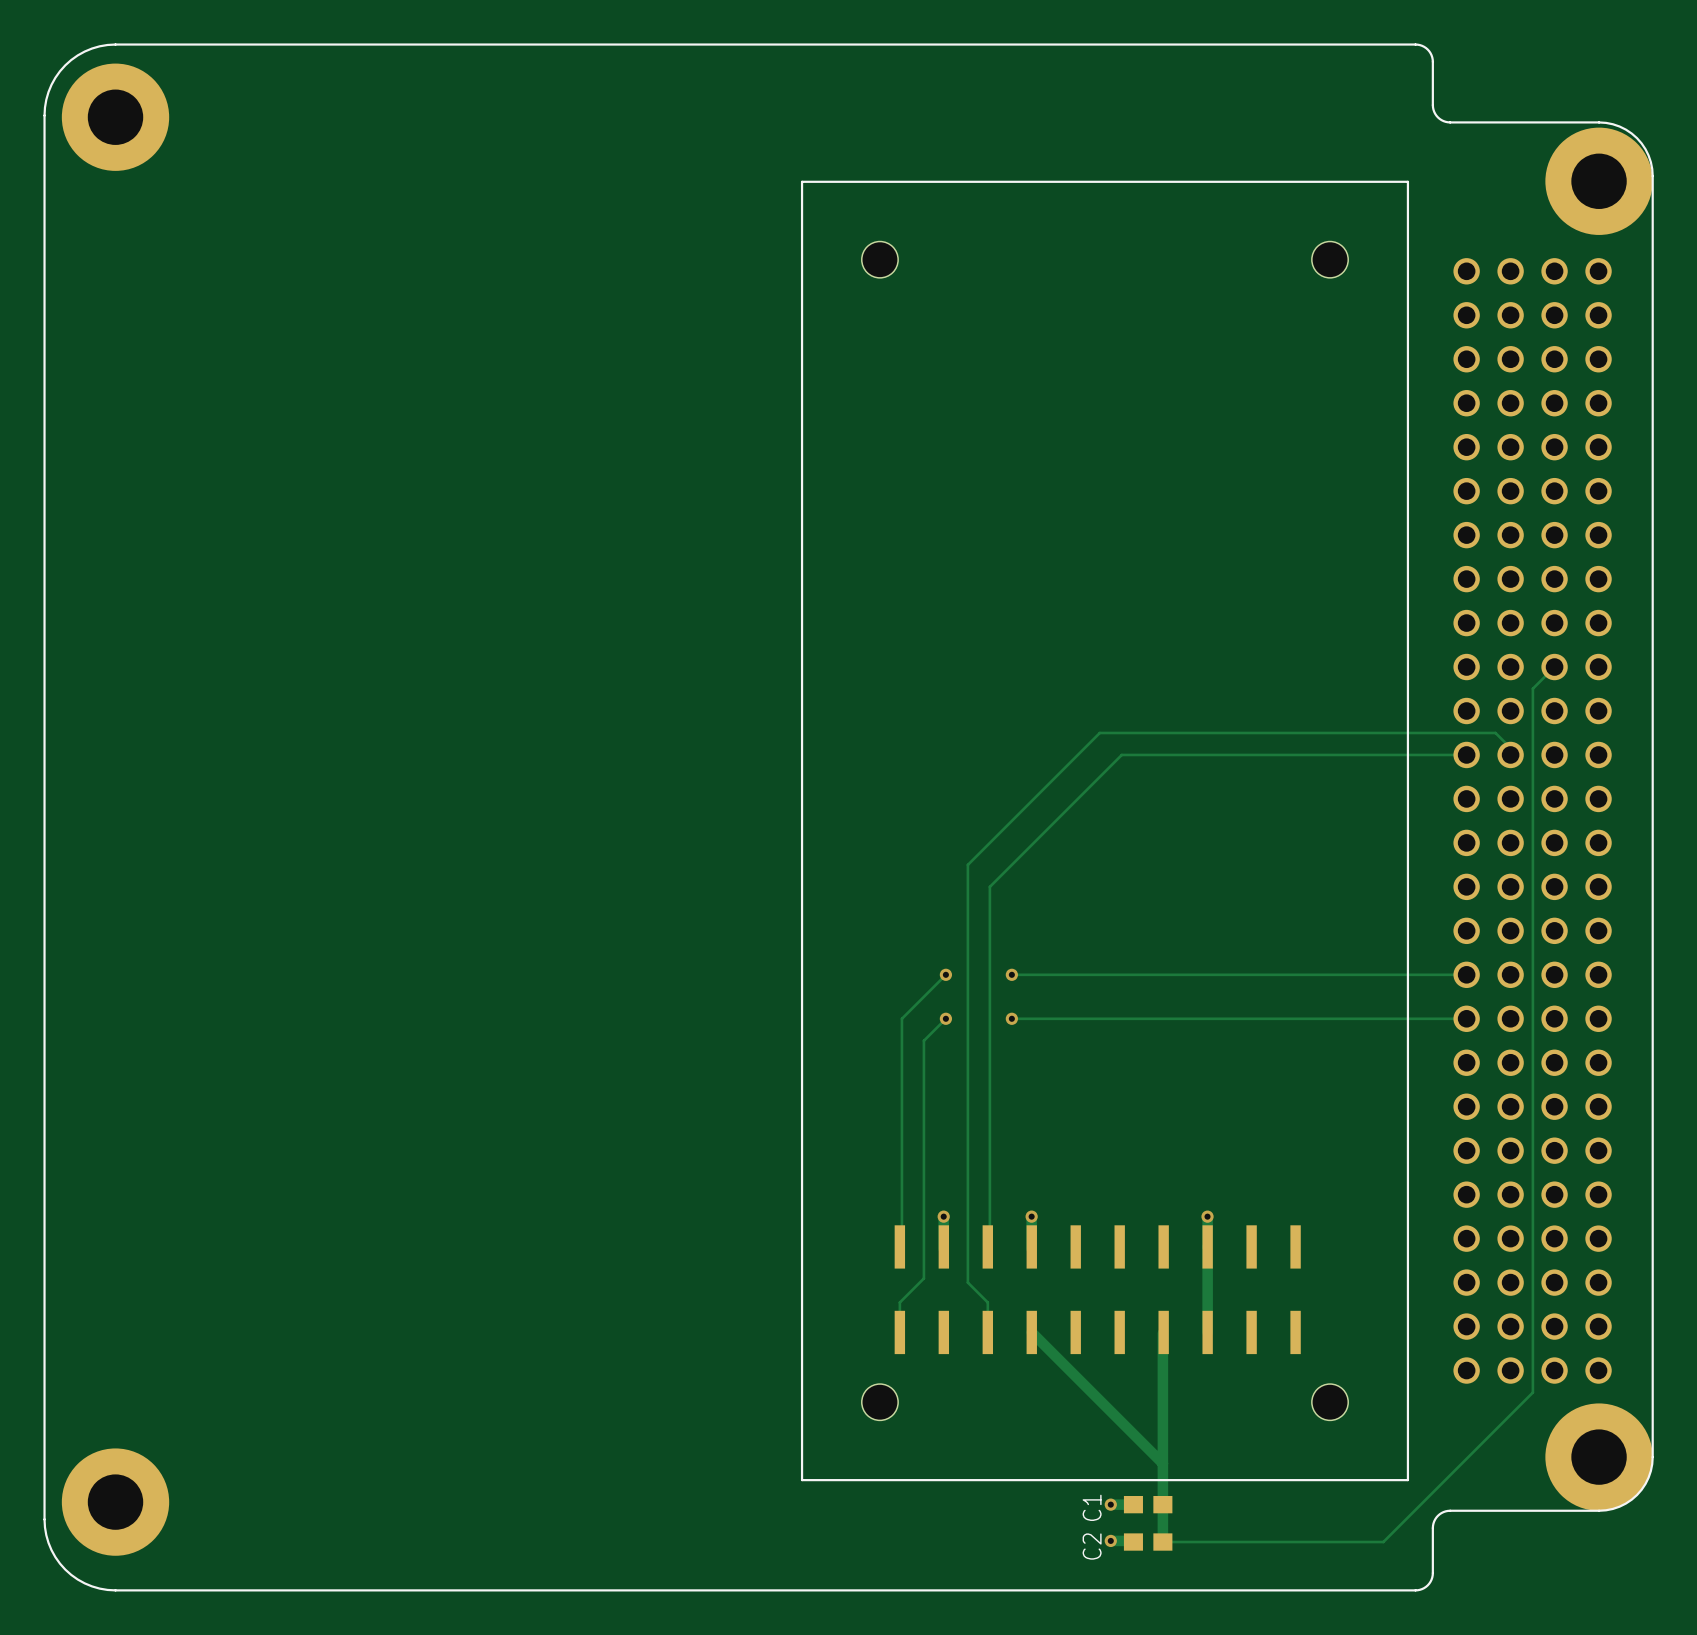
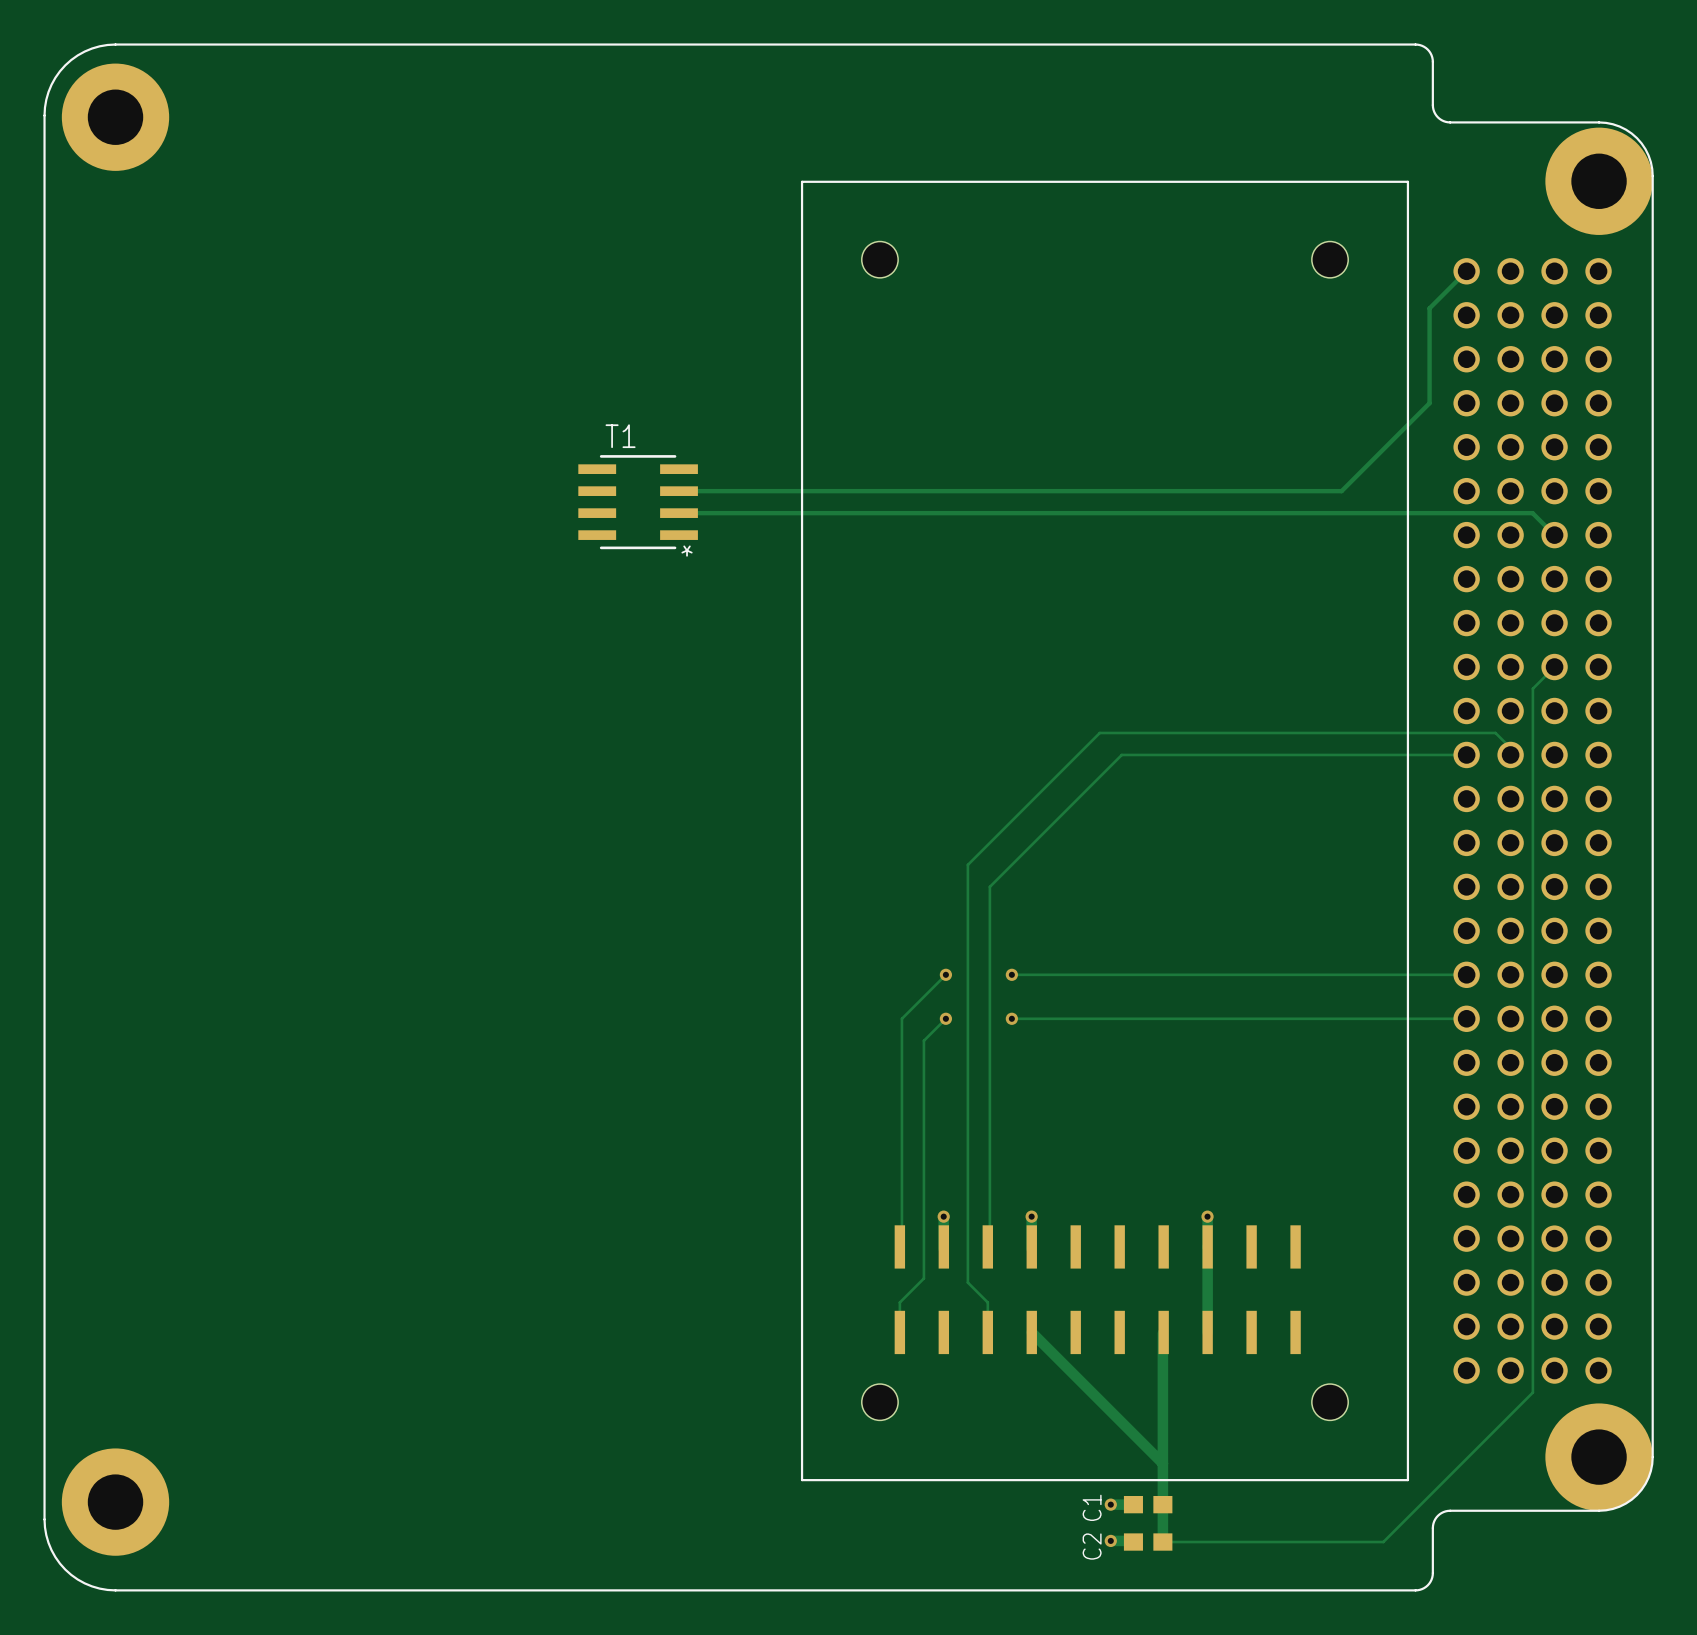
track: none -> (1466, 271) (1429, 308) (1429, 403) (1341, 491) (679, 491)
T1: none -> (638, 502)
track: none -> (679, 513) (1532, 513) (1554, 535)

